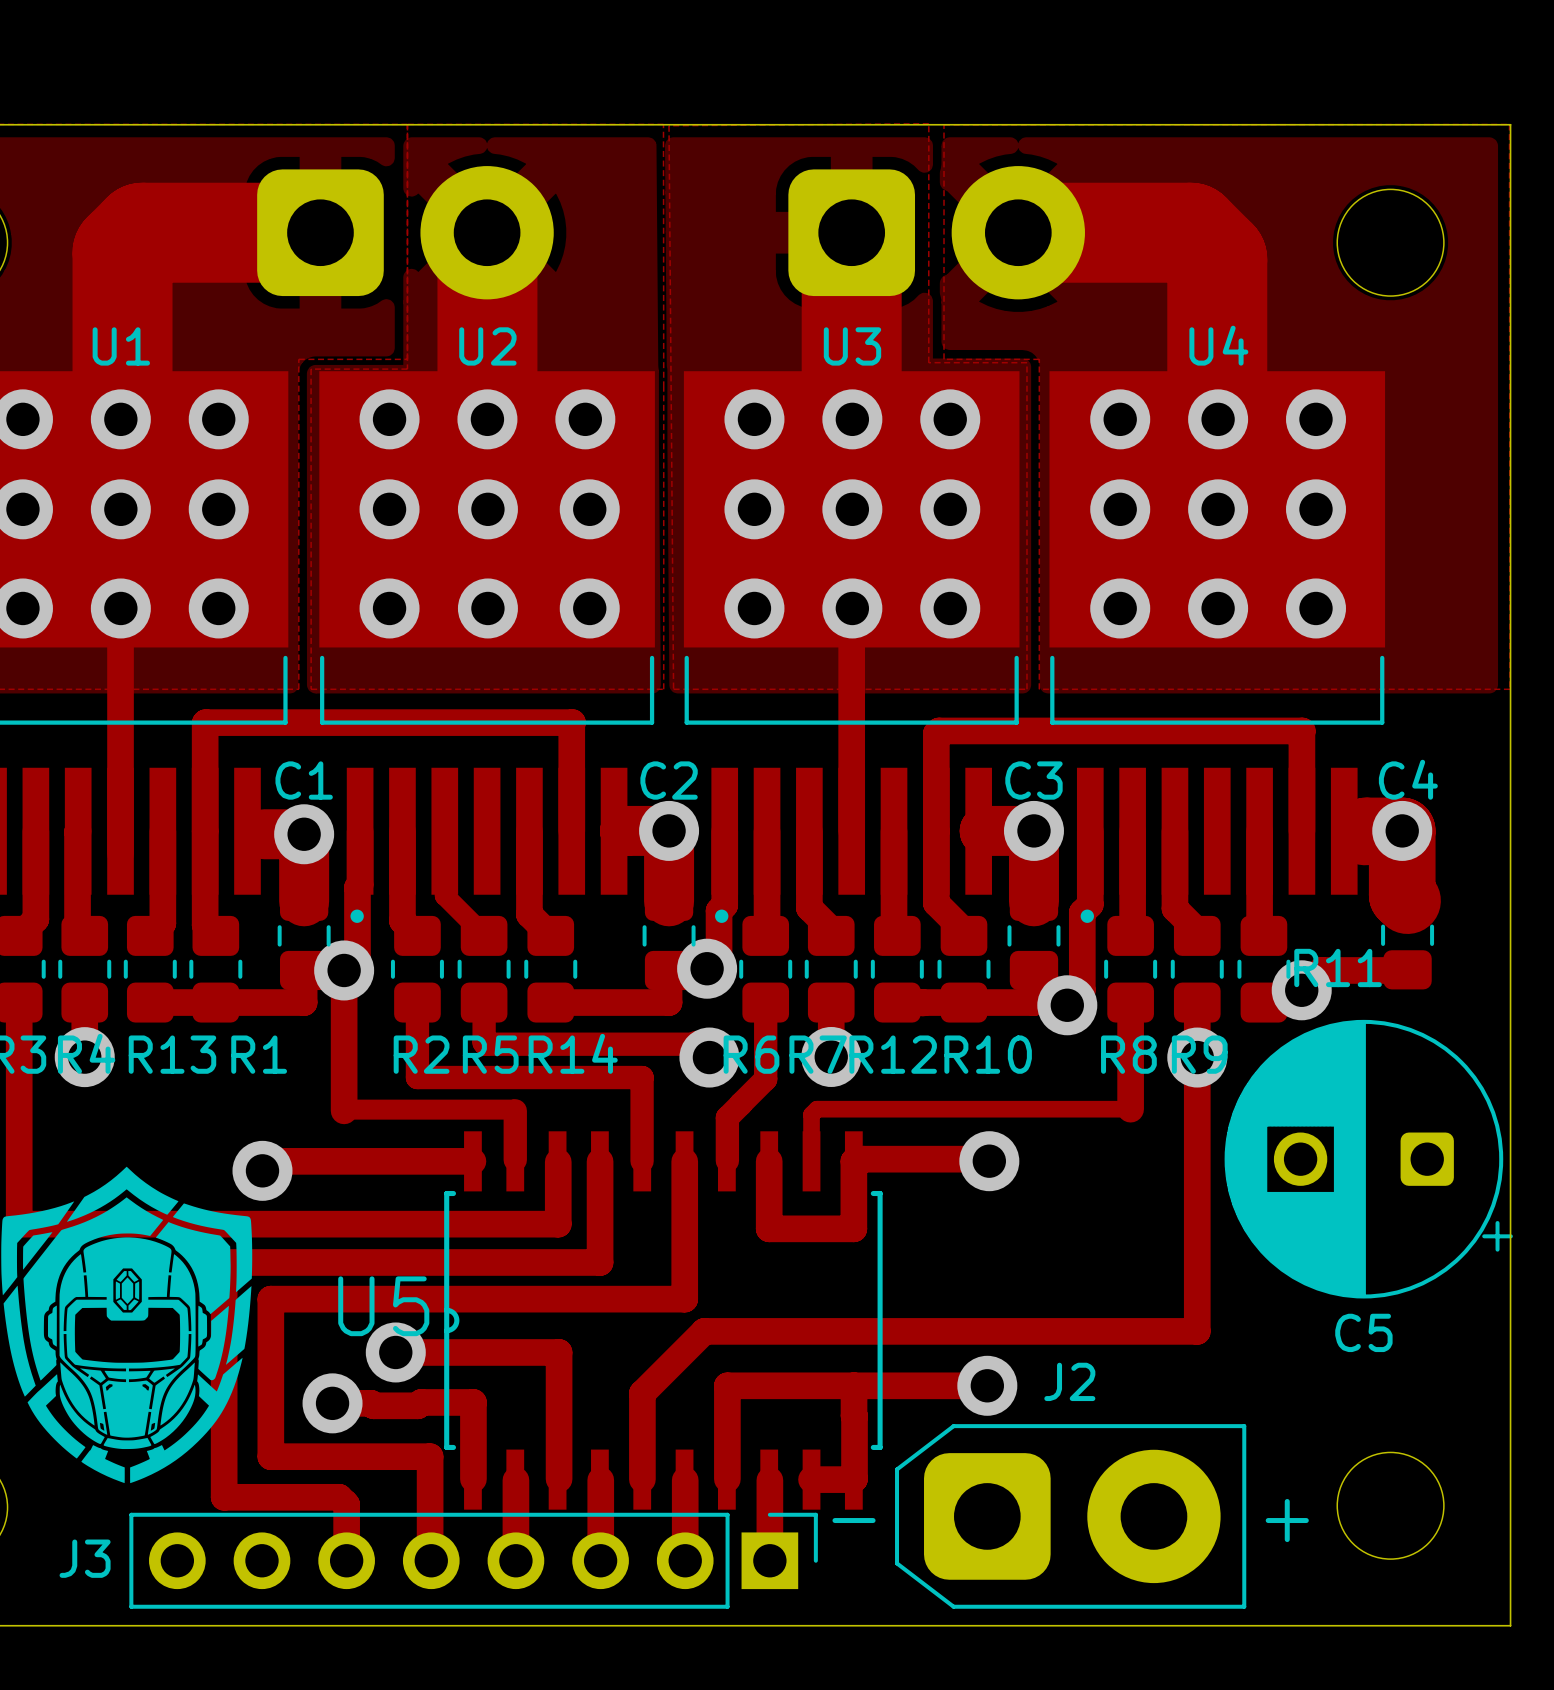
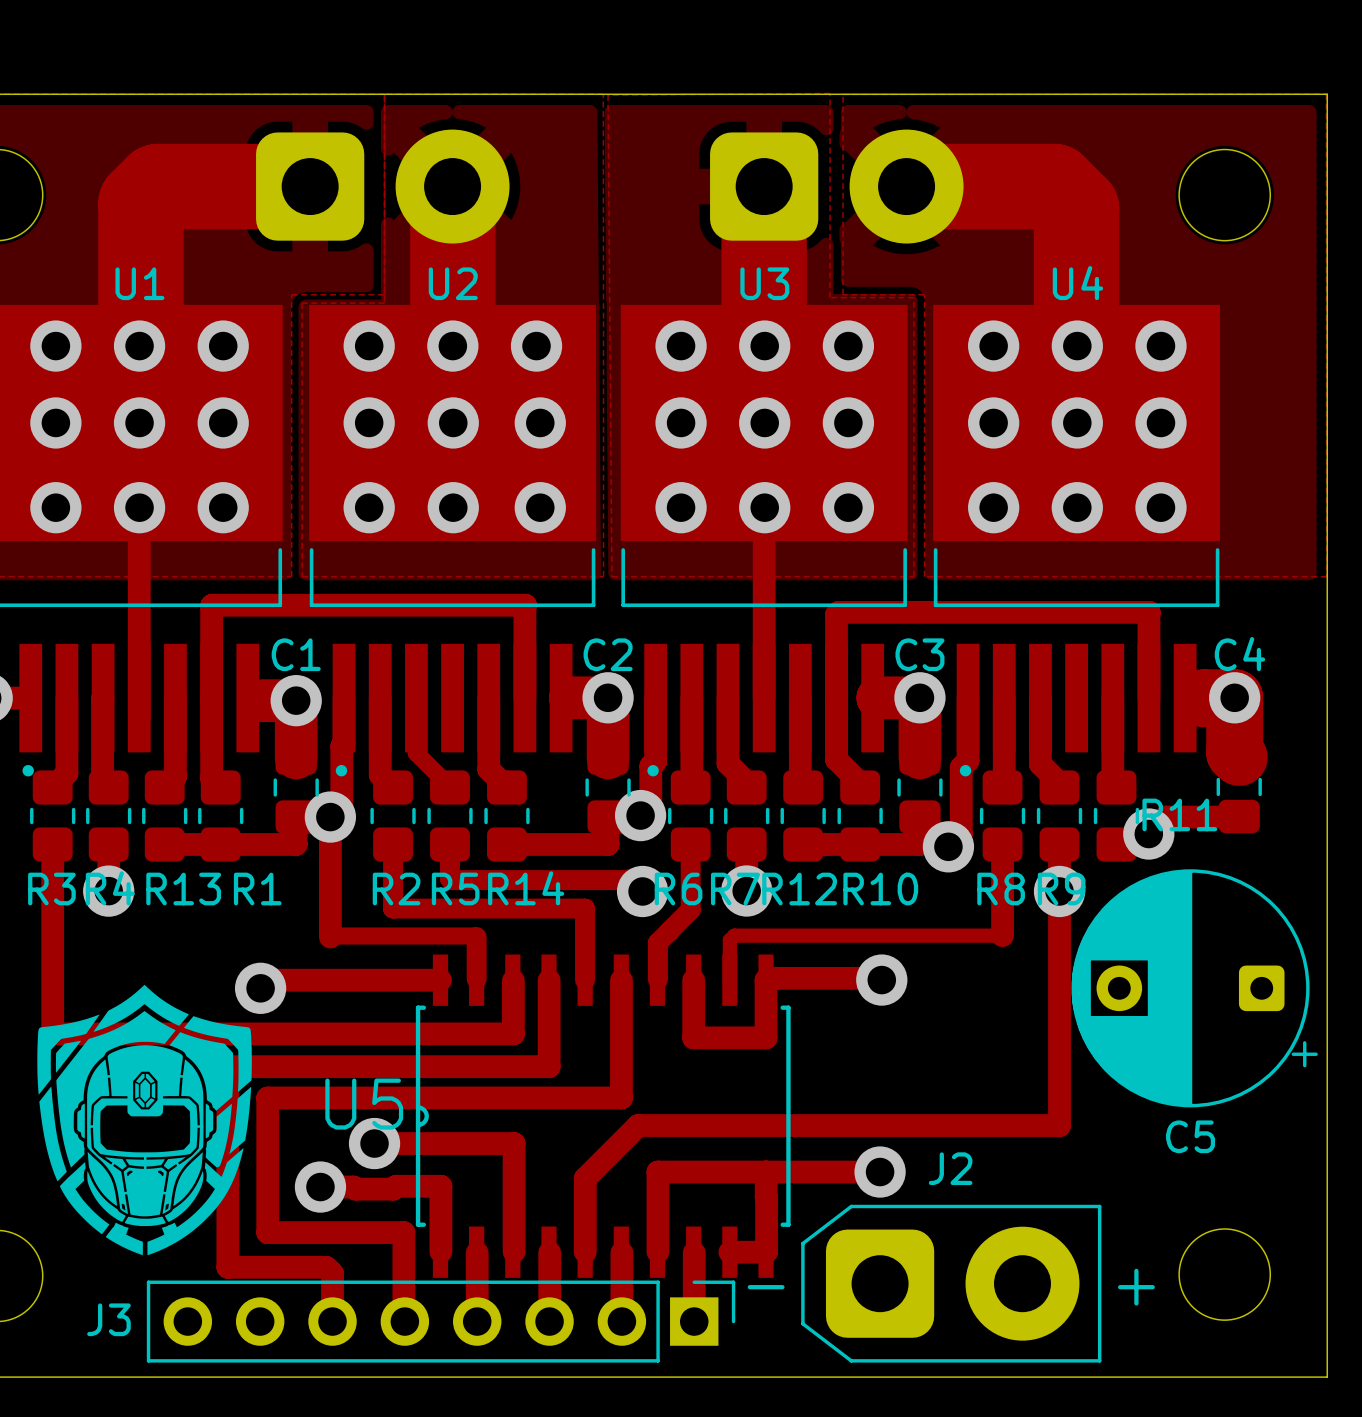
C5 footprint: [1224, 1019, 1513, 1299] -> [1071, 869, 1318, 1108]

